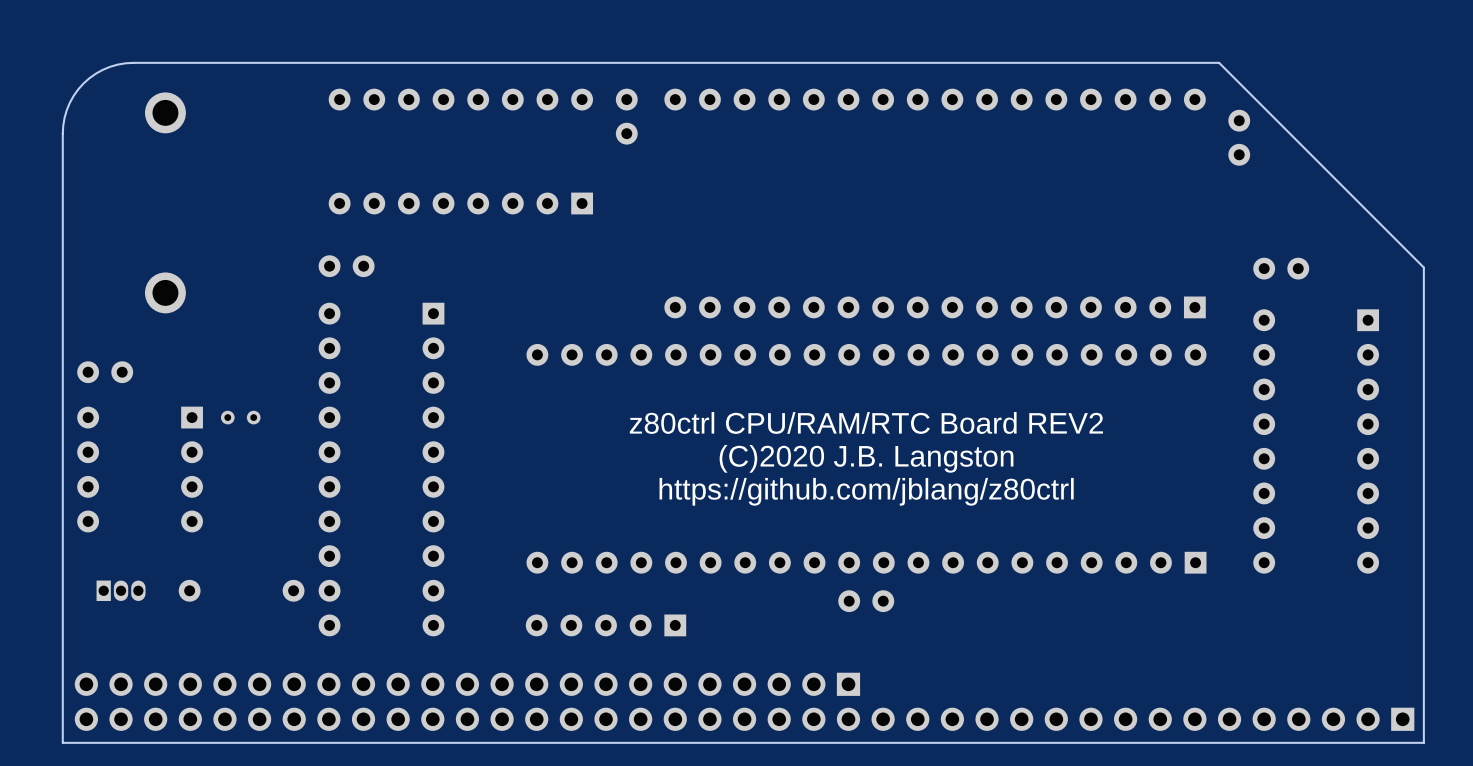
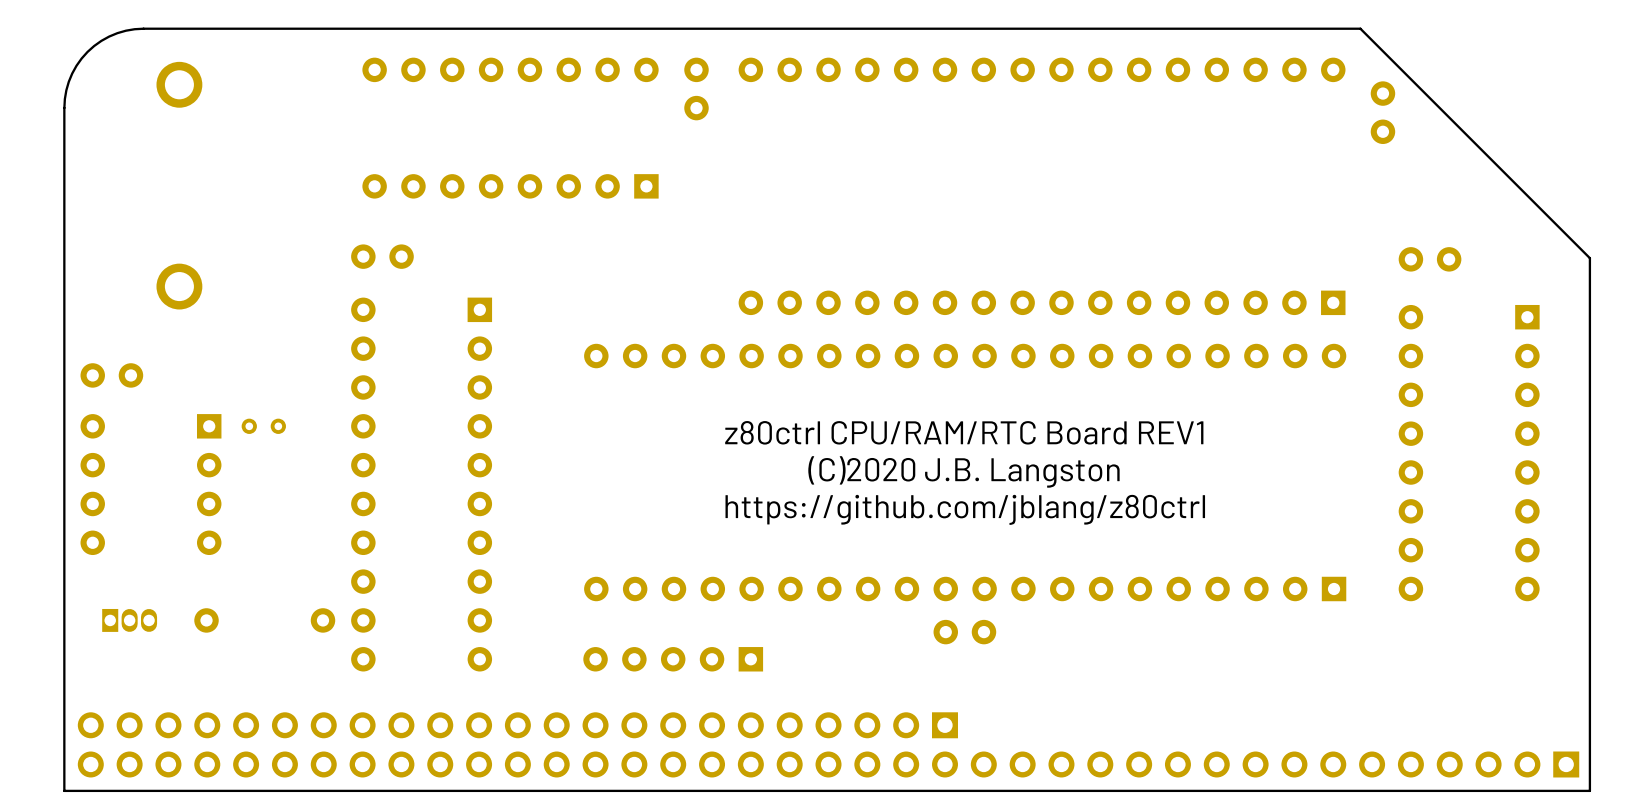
text: z80ctrl CPU/RAM/RTC Board REV2 (866, 422) -> z80ctrl CPU/RAM/RTC Board REV1 (964, 432)

